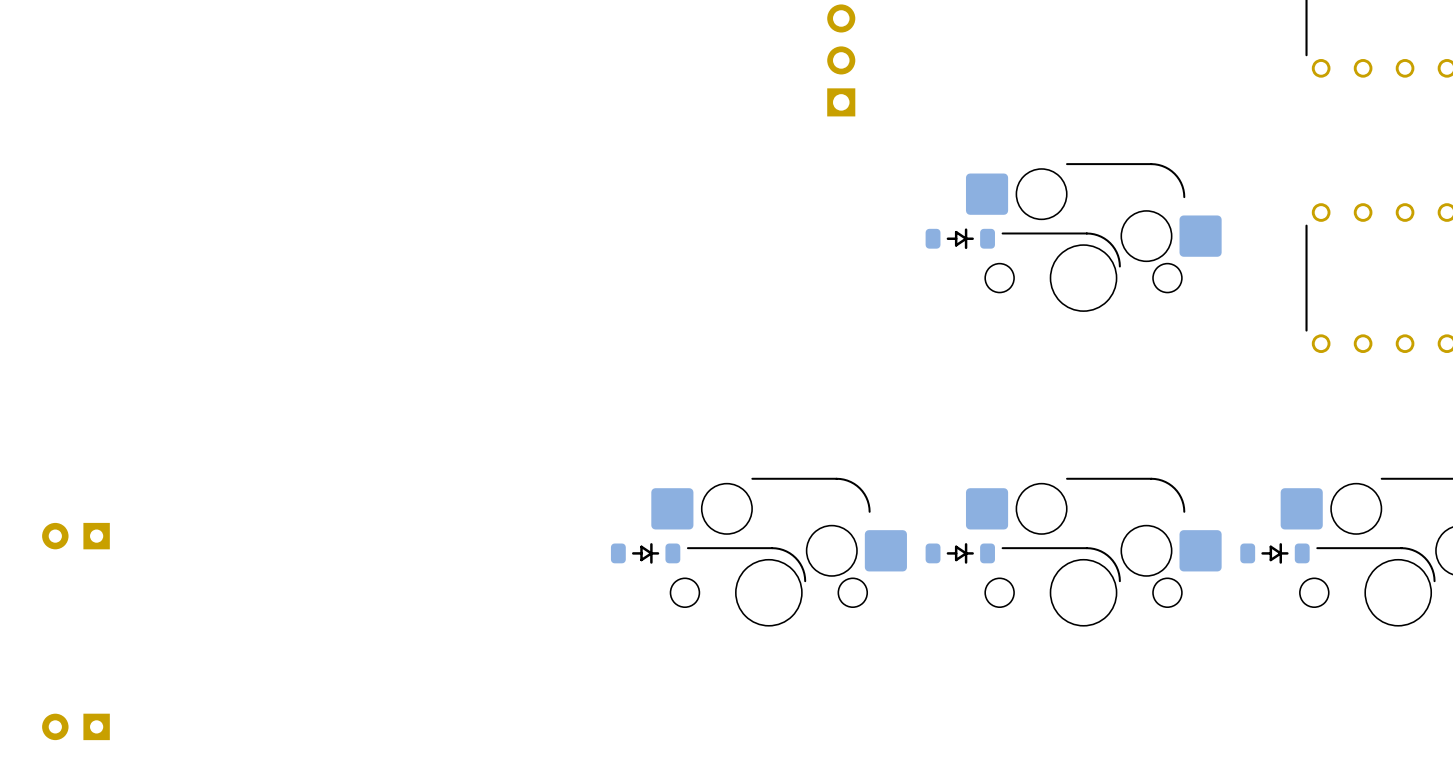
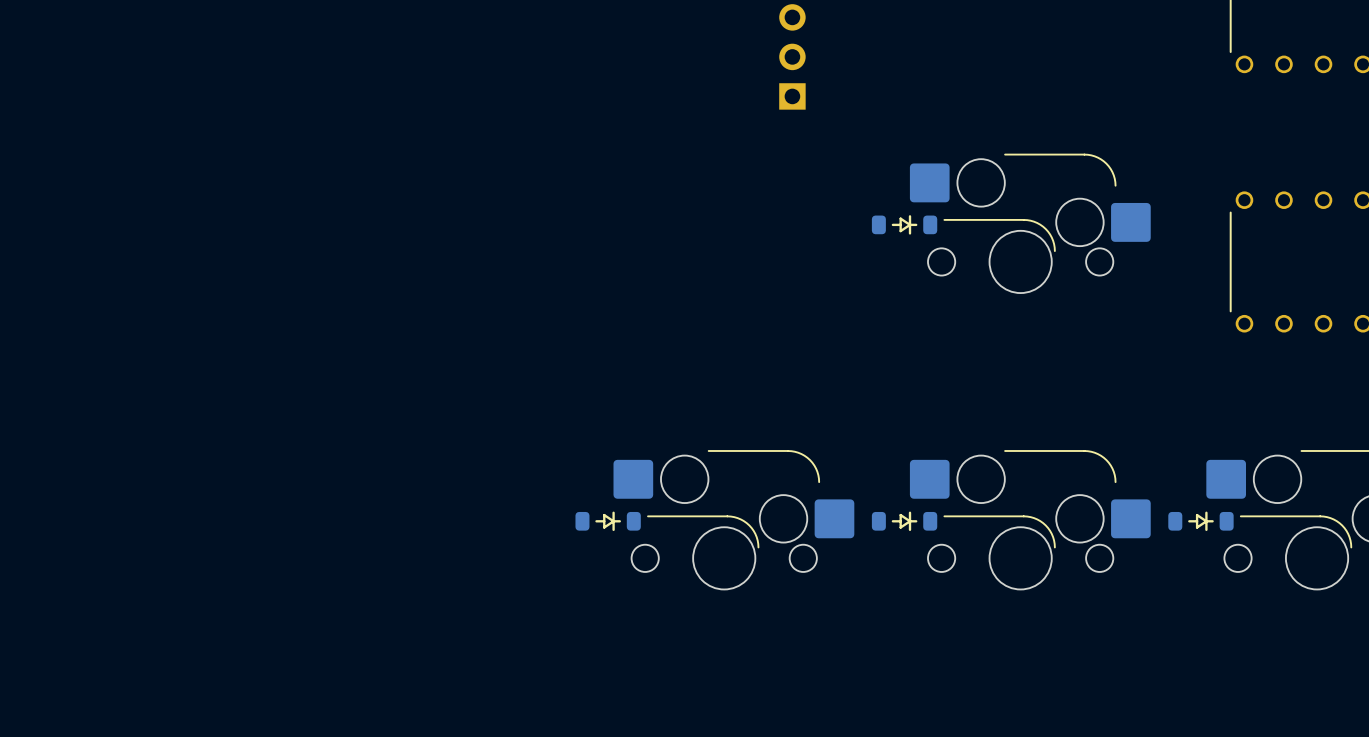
part: (75, 536) -> none
part: (75, 726) -> none

